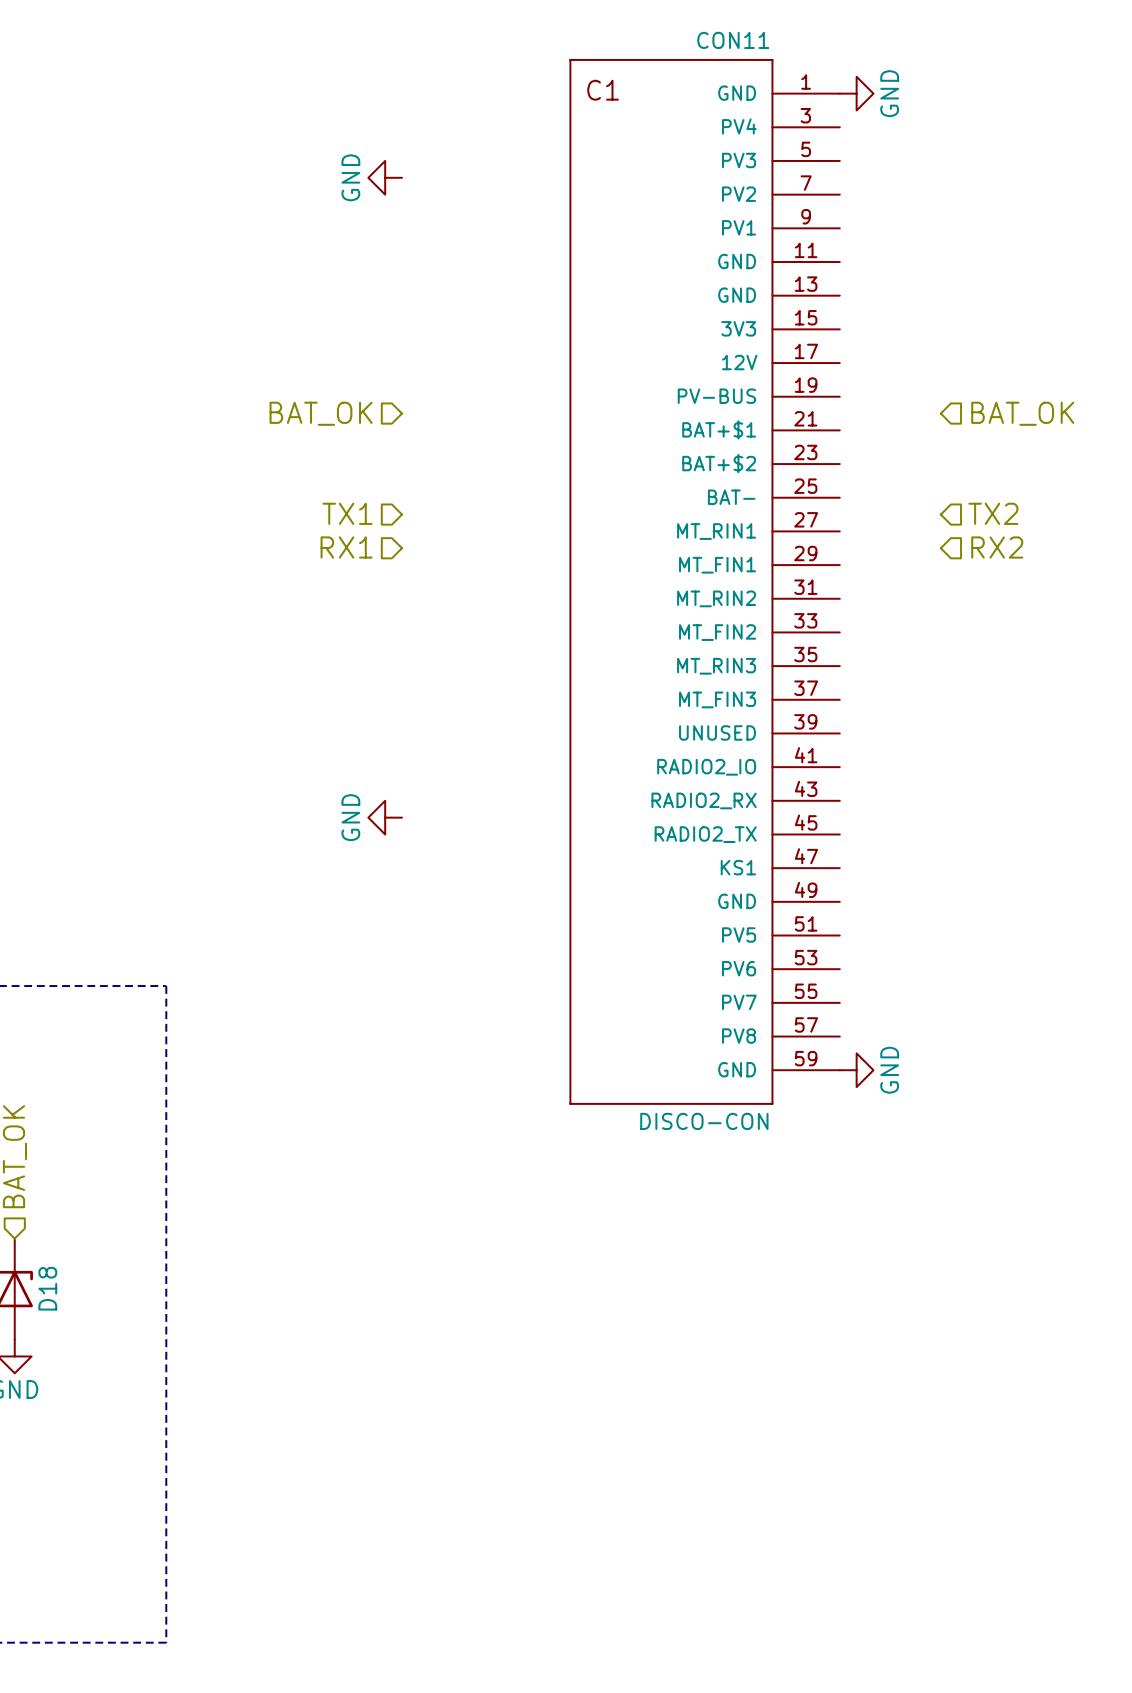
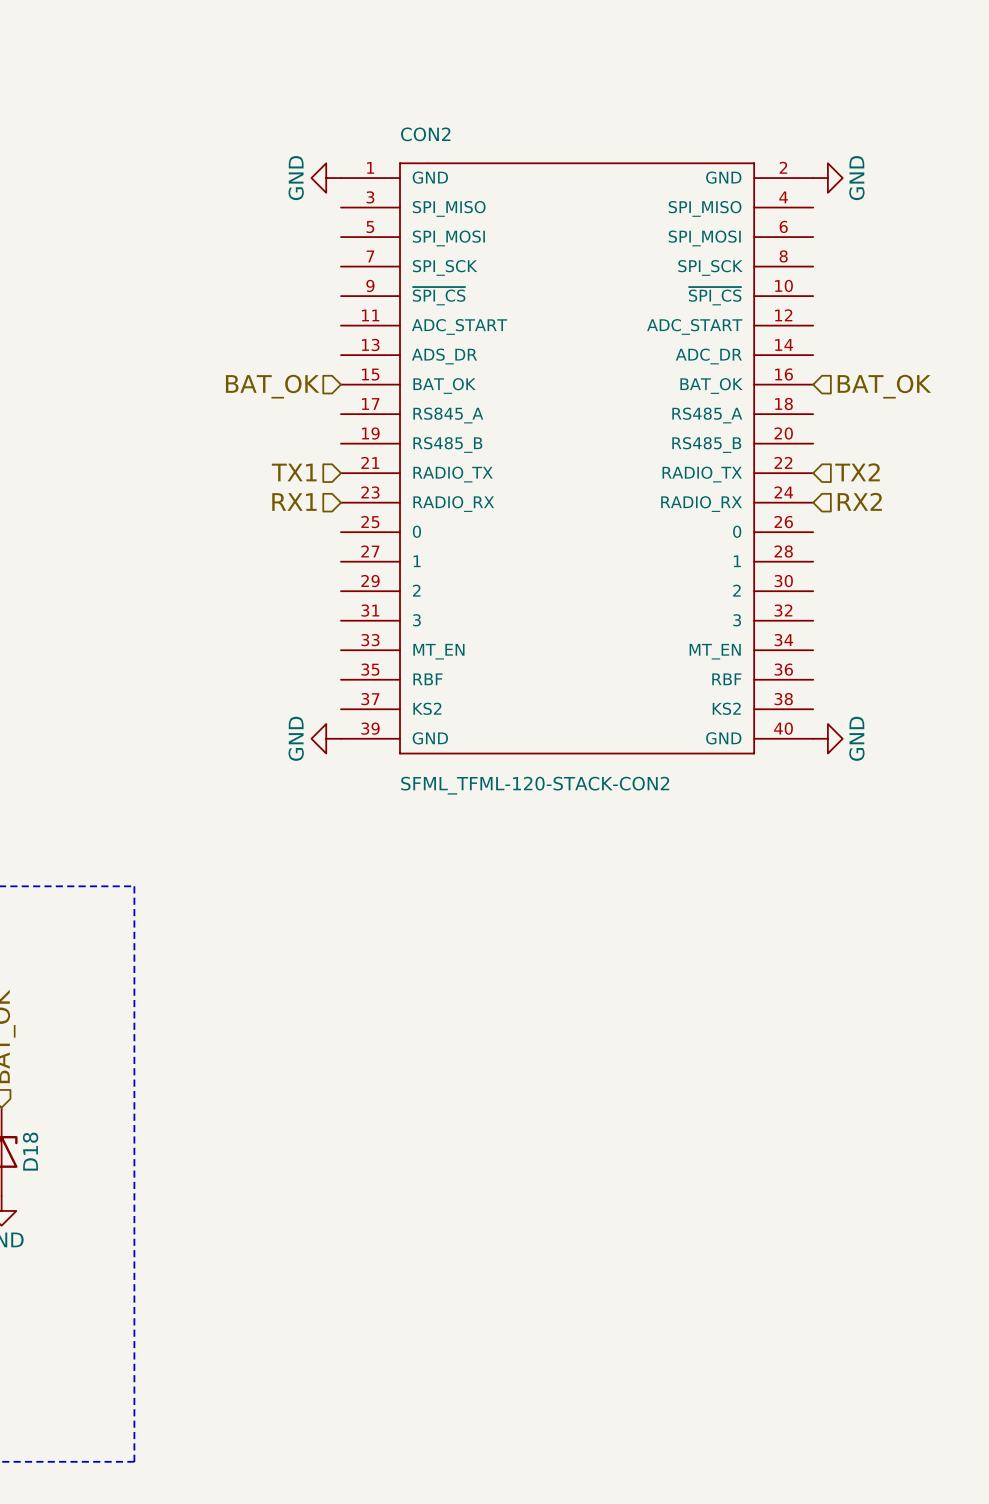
power symbol position: GND (856, 93) -> GND (827, 178)
CON2: none -> SFML_TFML-120-STACK-CON2 (577, 458)
CON11: DISCO-CON (705, 581) -> none
power symbol position: GND (856, 1070) -> GND (827, 738)

